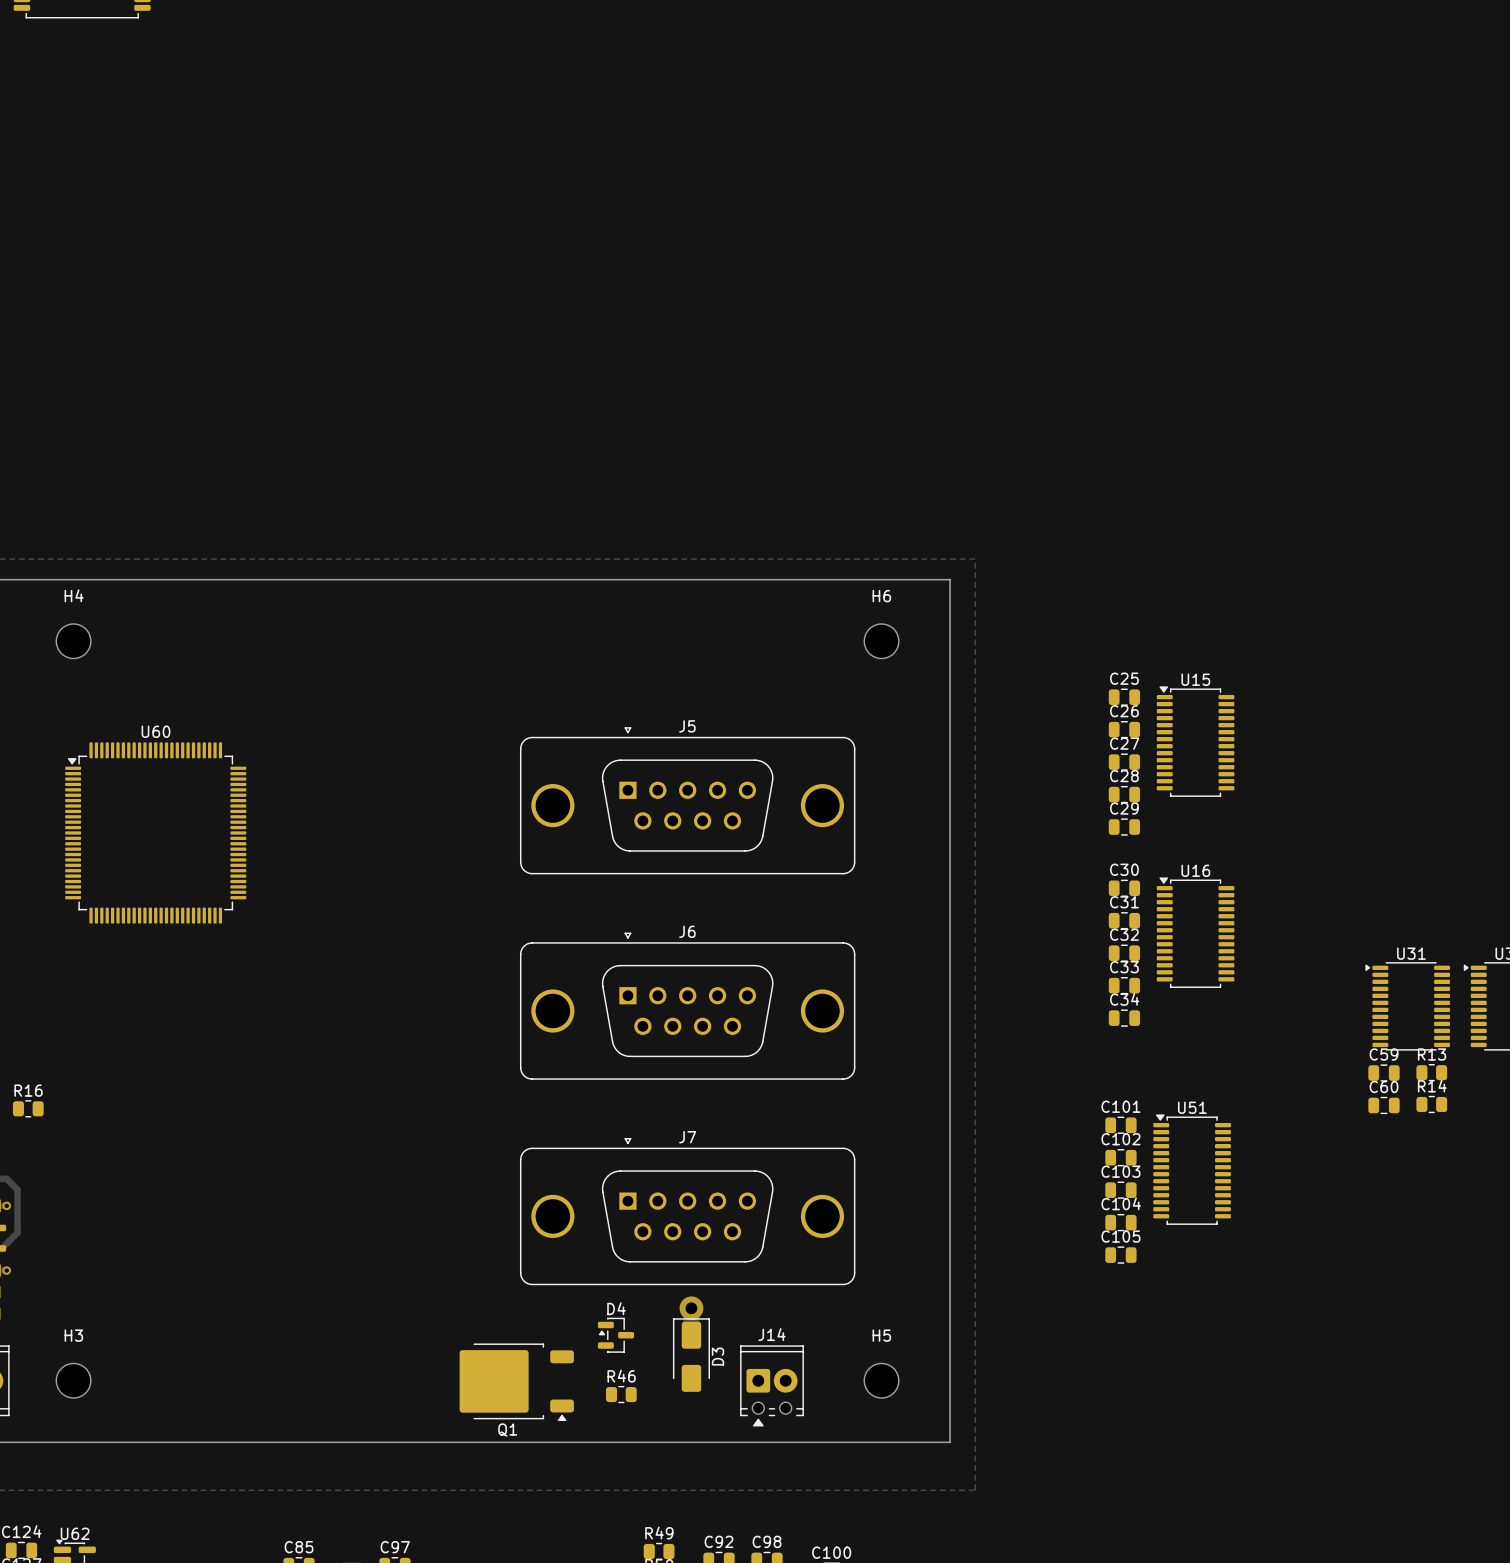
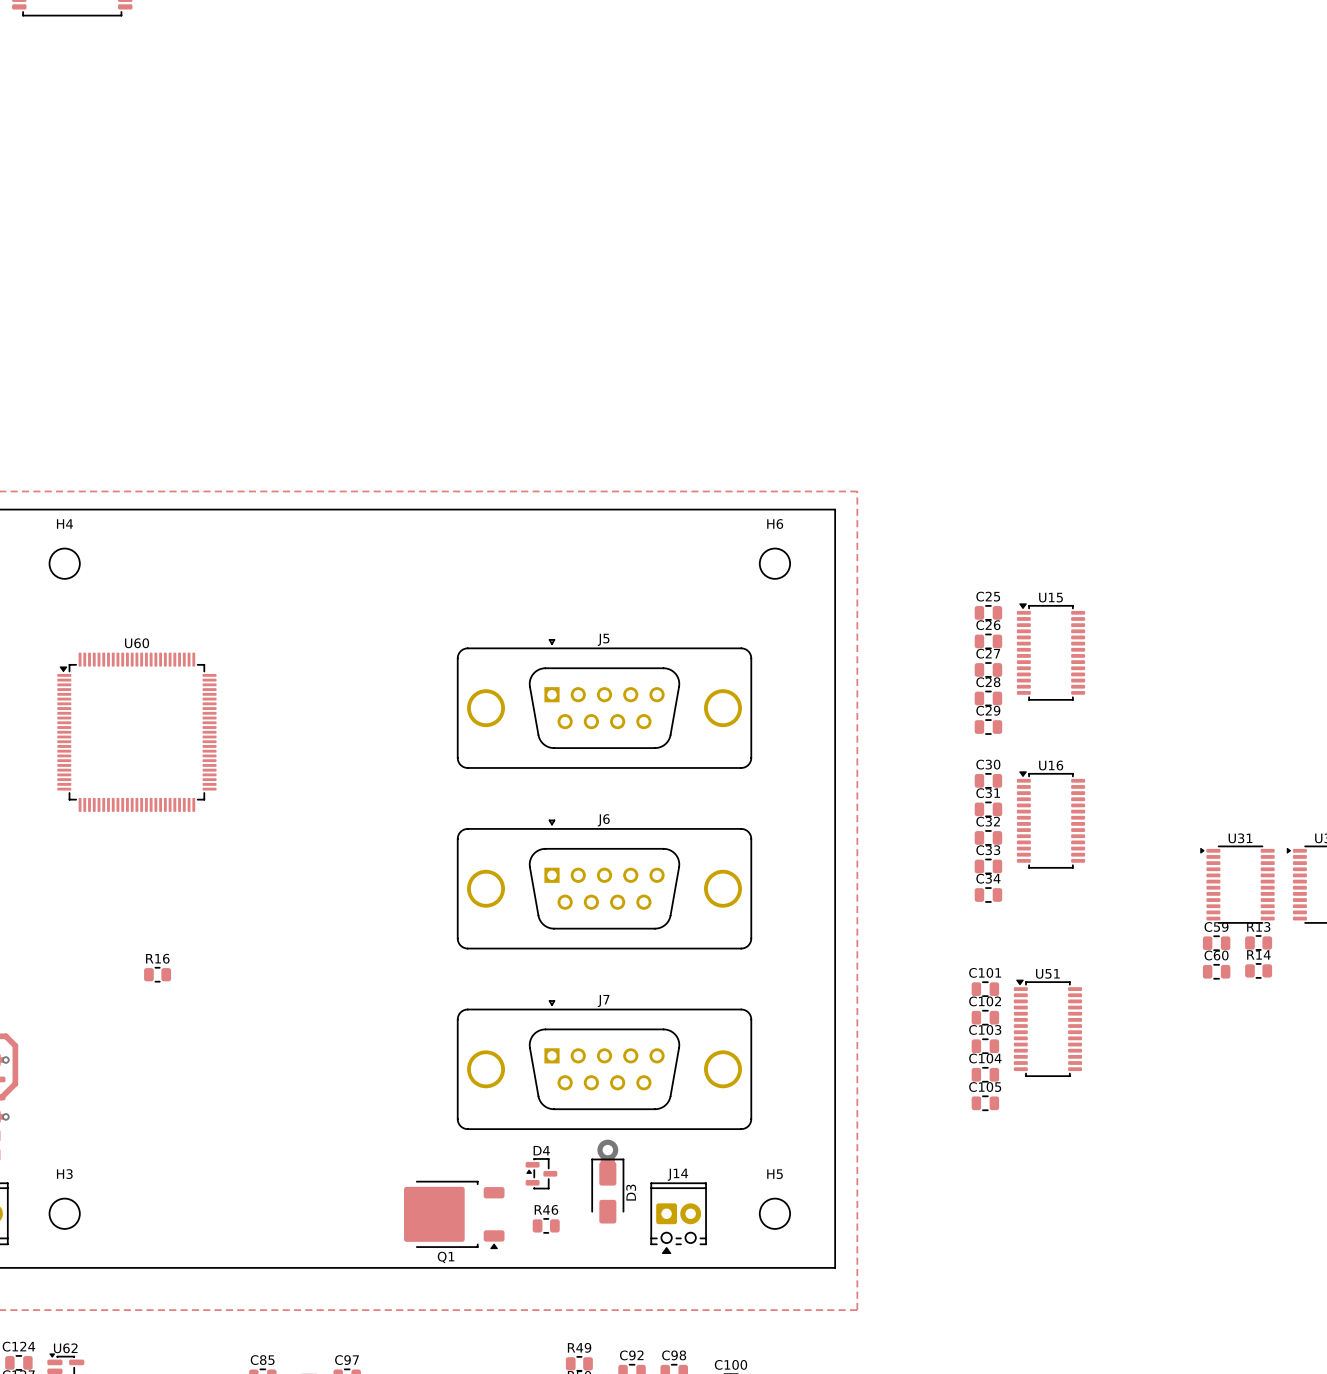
R16 position: (28, 1108) -> (157, 974)

